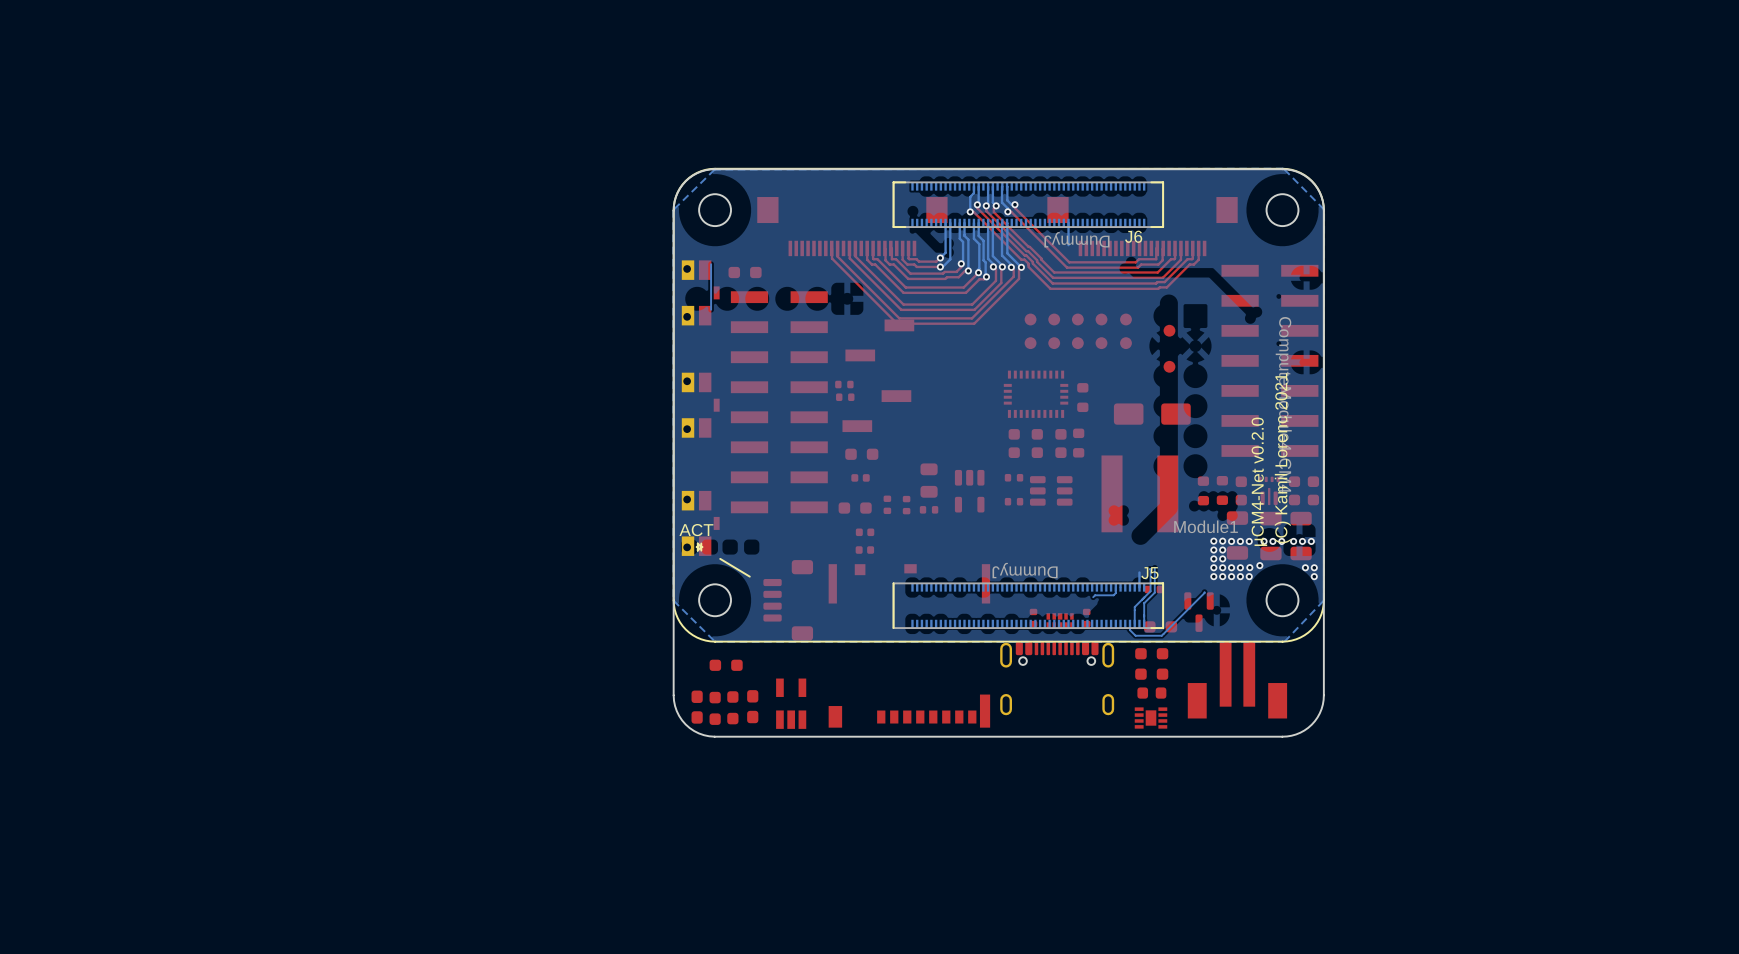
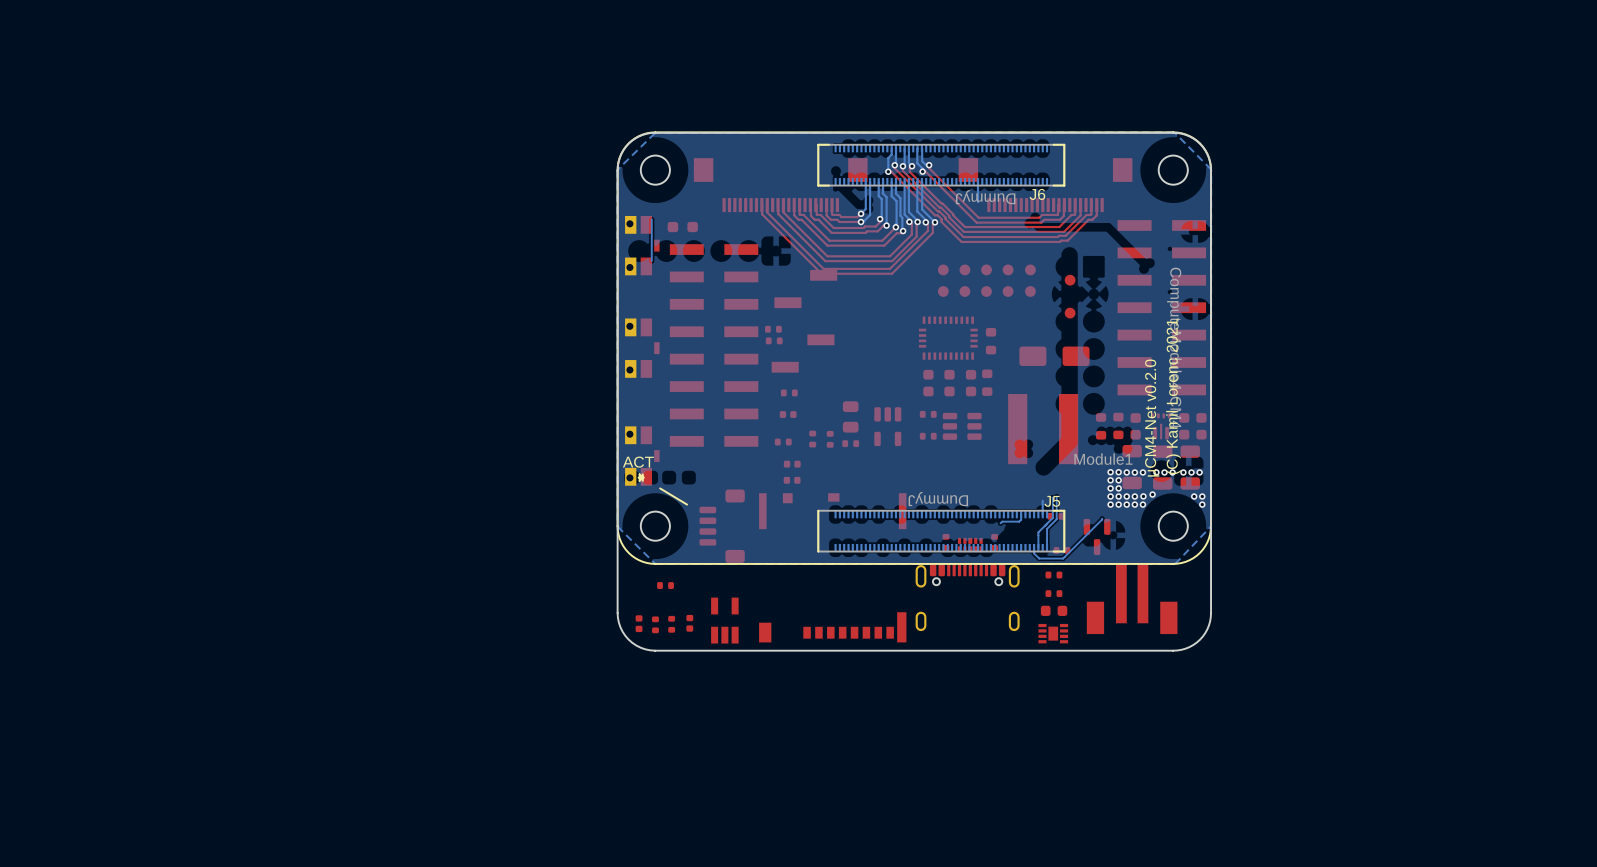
part footprint: [845, 448, 879, 460] -> [780, 389, 798, 397]
part footprint: [838, 502, 872, 514] -> [774, 438, 792, 446]
part footprint: [1144, 621, 1178, 633] -> [1053, 547, 1071, 554]
part footprint: [1135, 648, 1169, 660] -> [1045, 571, 1063, 579]
part footprint: [709, 659, 743, 671] -> [657, 582, 674, 589]
part footprint: [1135, 668, 1169, 680] -> [1045, 590, 1063, 598]
part footprint: [691, 690, 703, 724] -> [635, 615, 643, 633]
part footprint: [747, 690, 759, 724] -> [686, 614, 694, 632]
part footprint: [709, 691, 721, 725] -> [652, 616, 659, 634]
part footprint: [727, 691, 739, 725] -> [668, 615, 676, 633]

